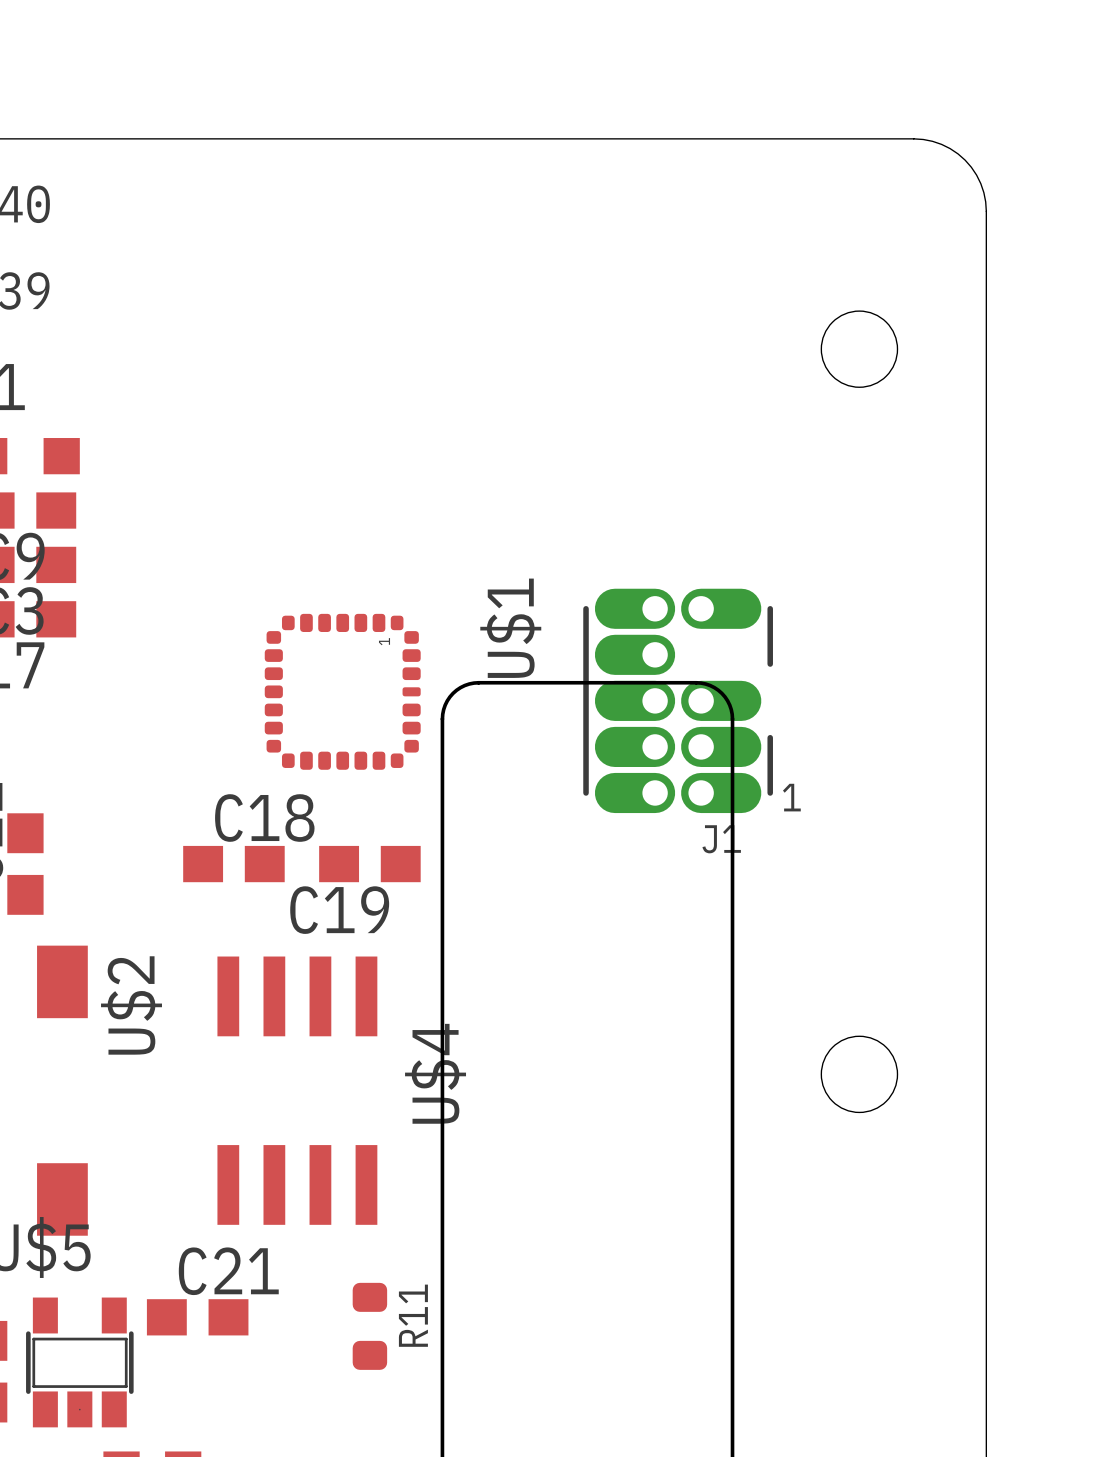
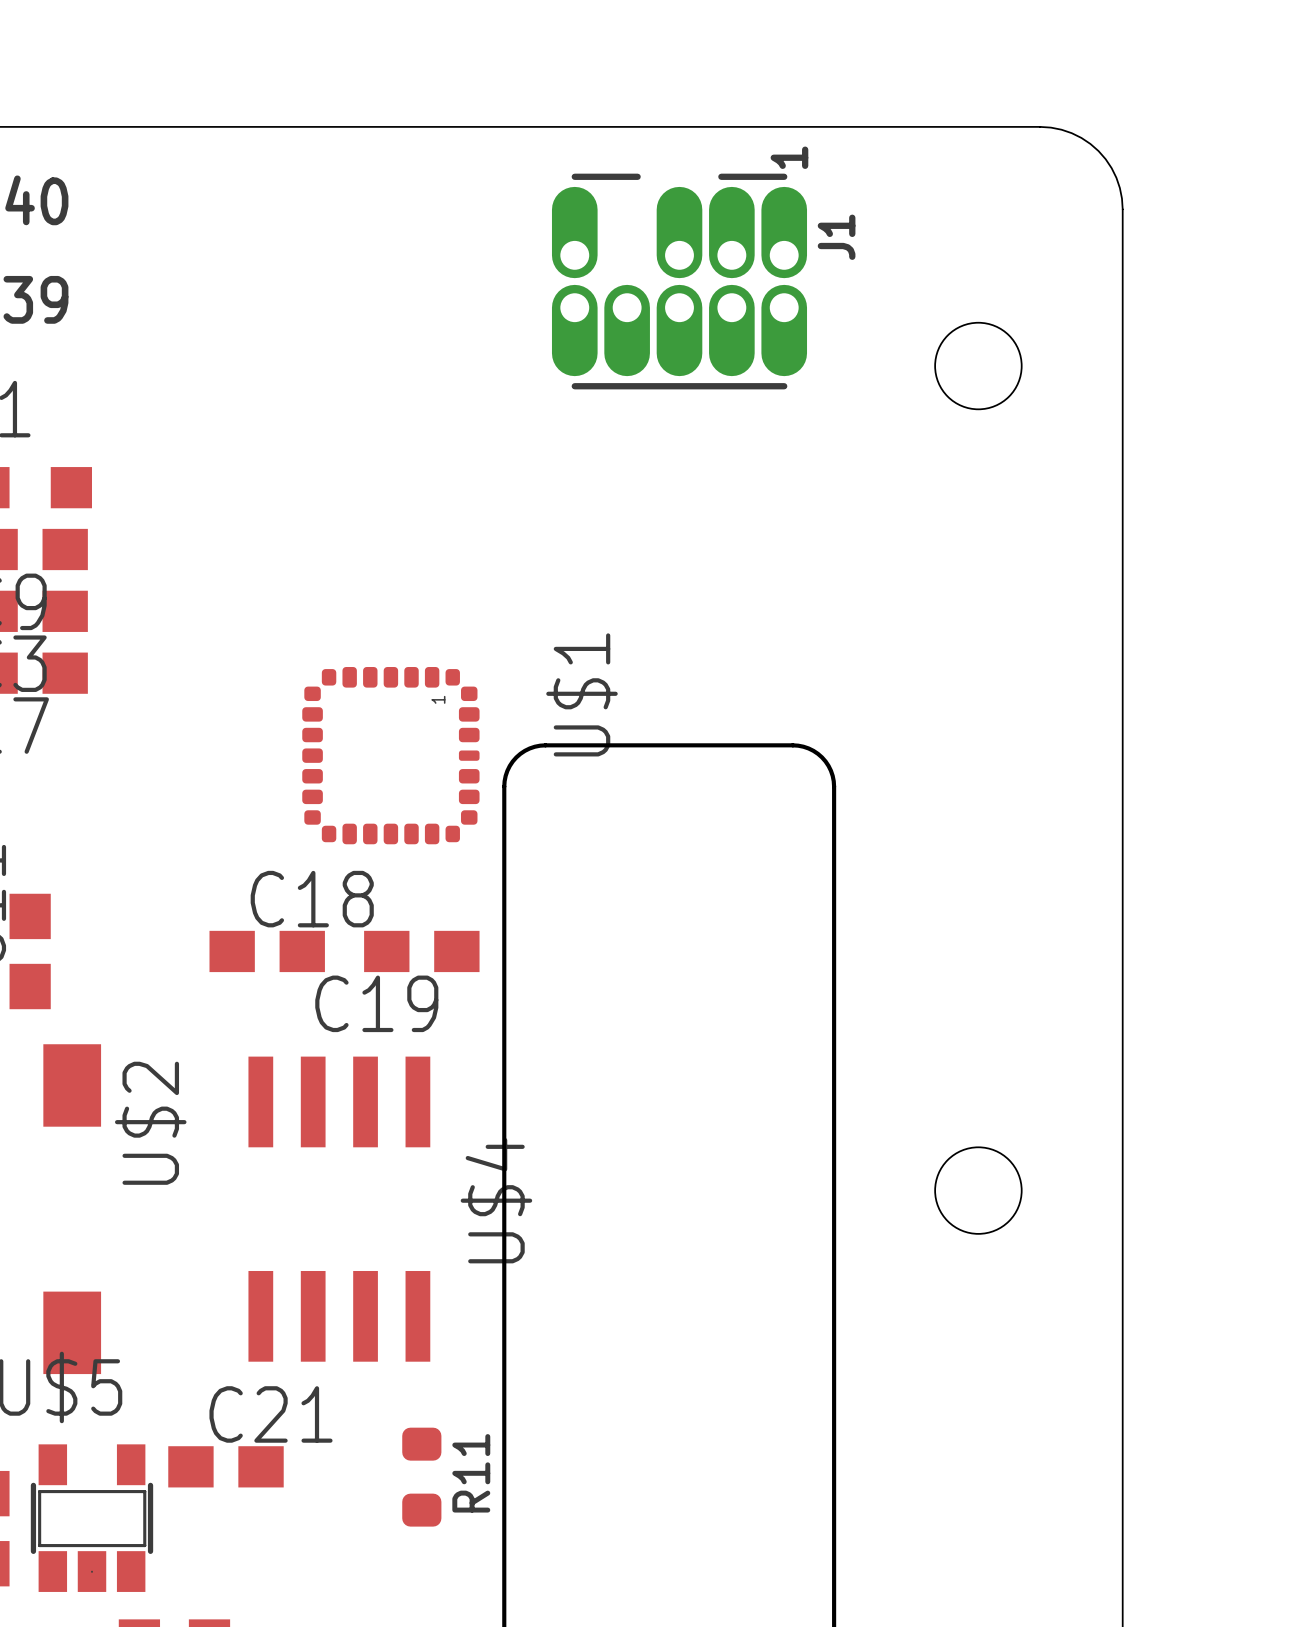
J1 rotation: 0° (678, 700) -> 90° counterclockwise (679, 281)
J1 position: (678, 700) -> (679, 281)

